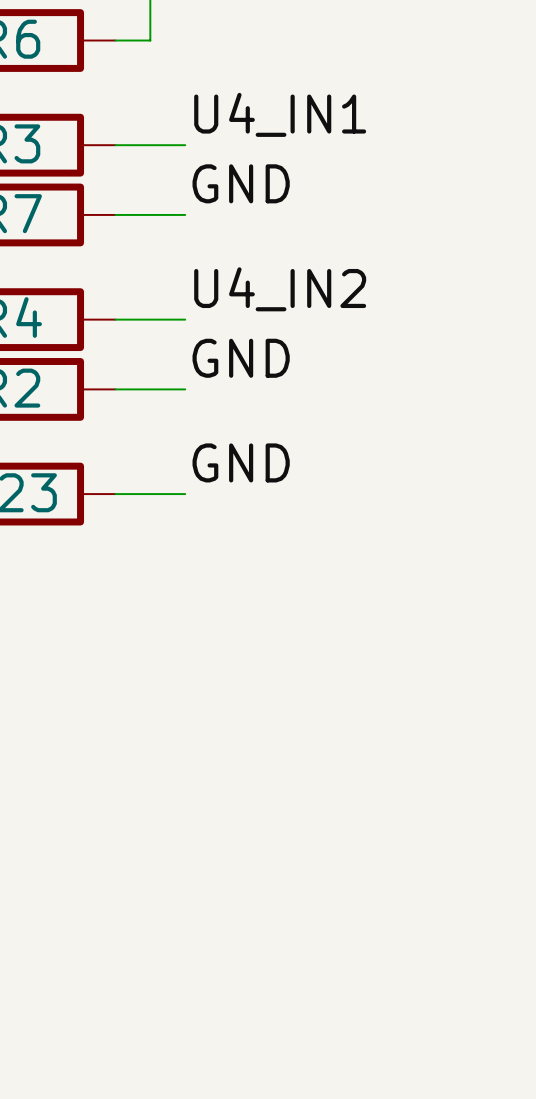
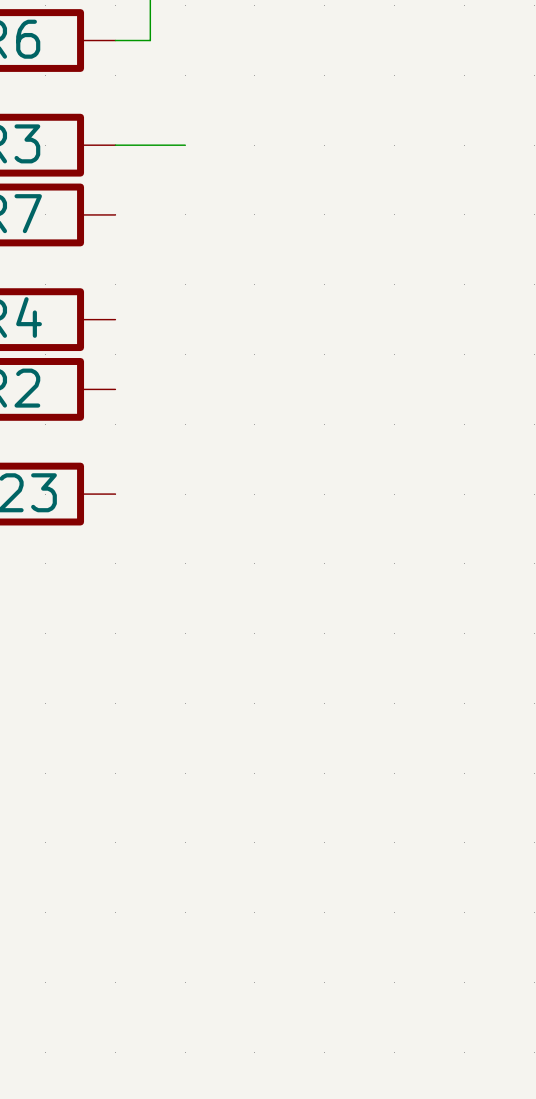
label: U4_IN1 (280, 114) -> none
label: GND (241, 183) -> none
wire: (115, 214) (185, 214) -> none
label: U4_IN2 (280, 289) -> none
wire: (115, 319) (185, 319) -> none
label: GND (241, 358) -> none
wire: (115, 389) (185, 389) -> none
label: GND (241, 462) -> none
wire: (115, 494) (185, 494) -> none

